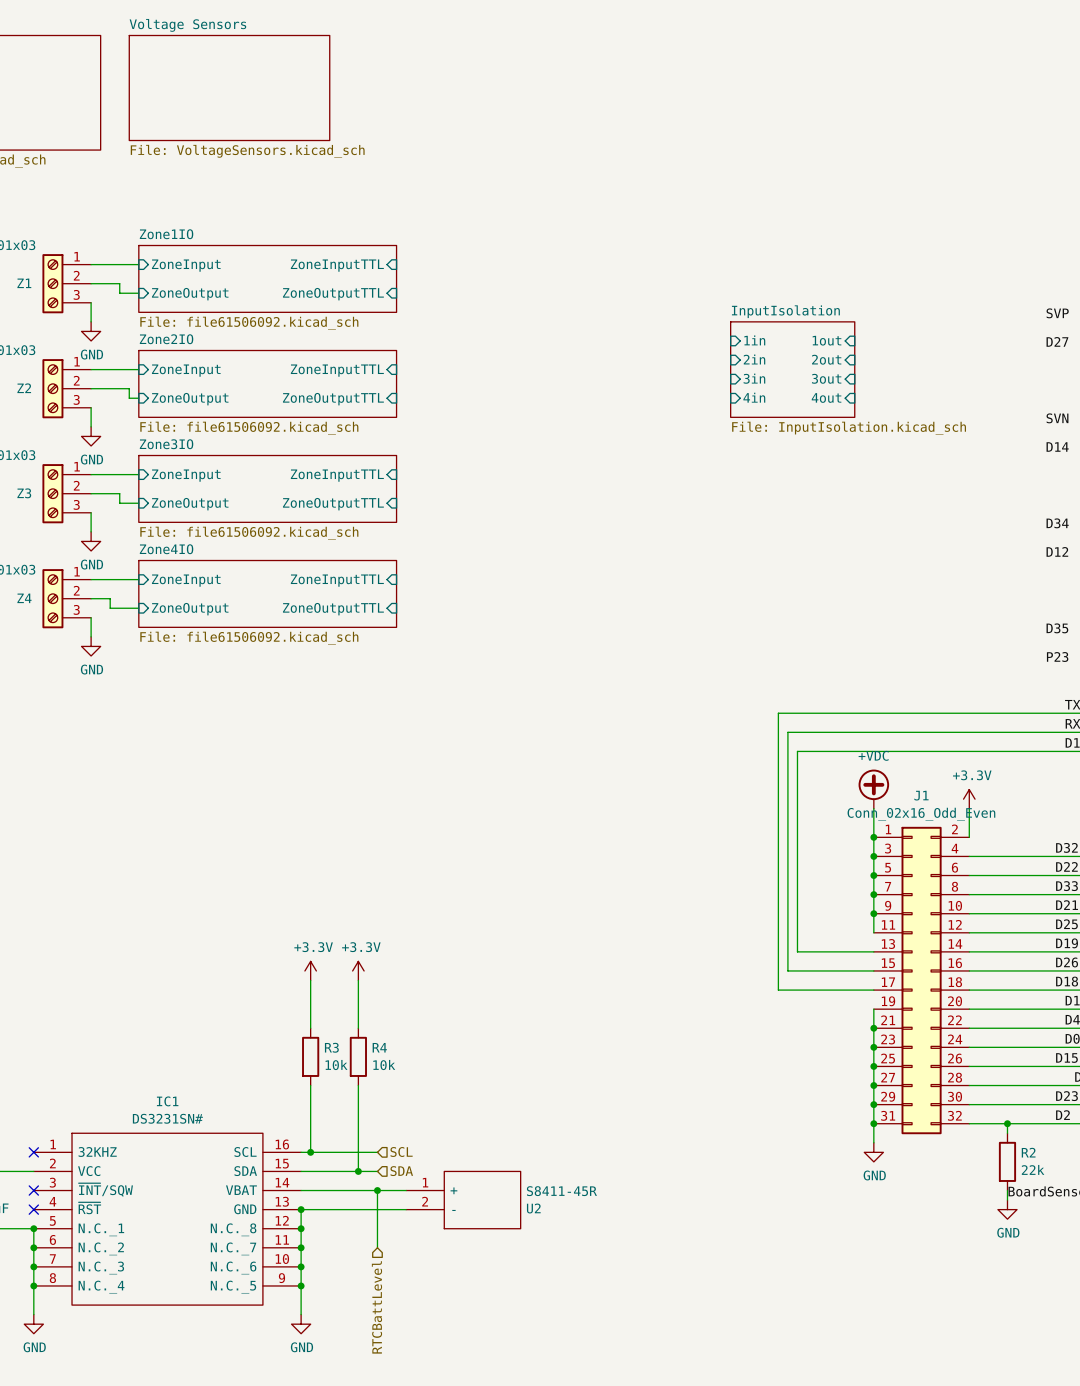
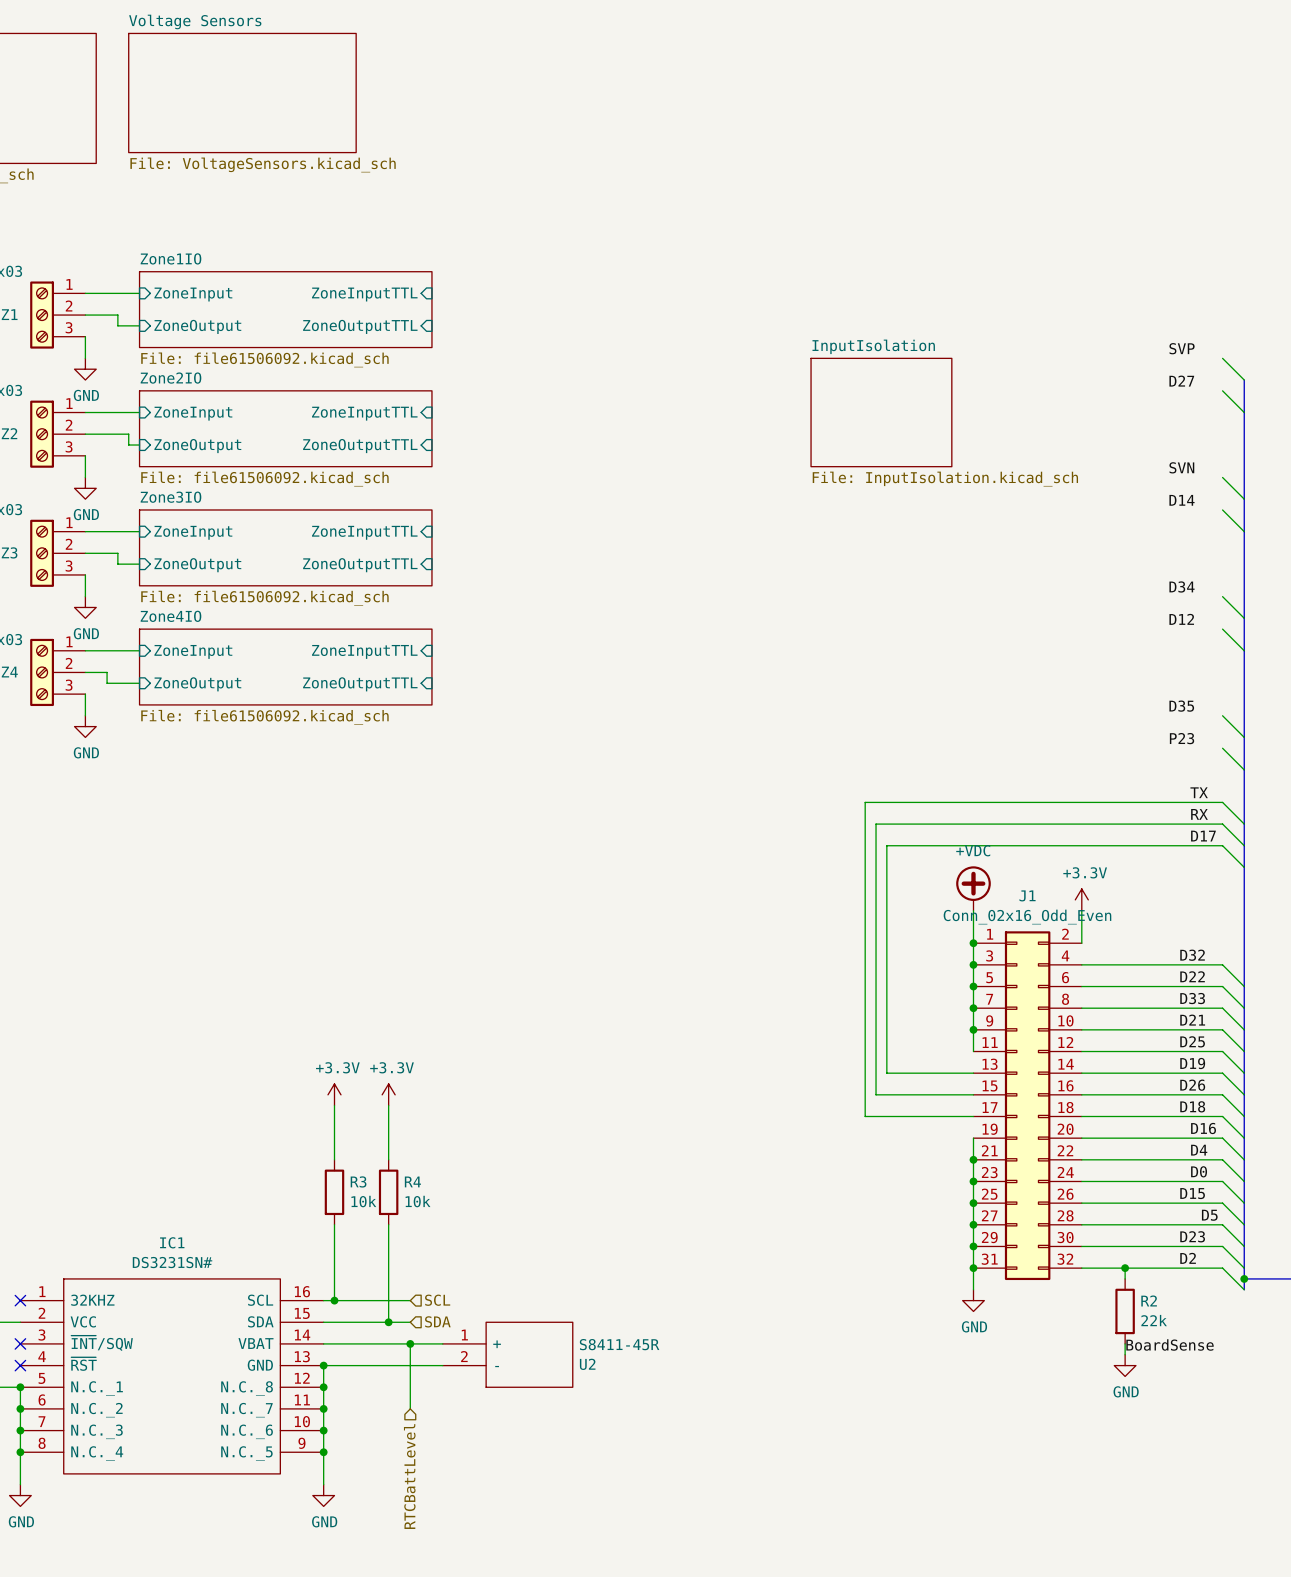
sheet pin: 1in (754, 340) -> none
sheet pin: 1out (827, 340) -> none
sheet pin: 2in (754, 359) -> none
sheet pin: 2out (826, 359) -> none
sheet pin: 3in (754, 378) -> none
sheet pin: 3out (826, 378) -> none
sheet pin: 4in (754, 397) -> none
sheet pin: 4out (826, 397) -> none

